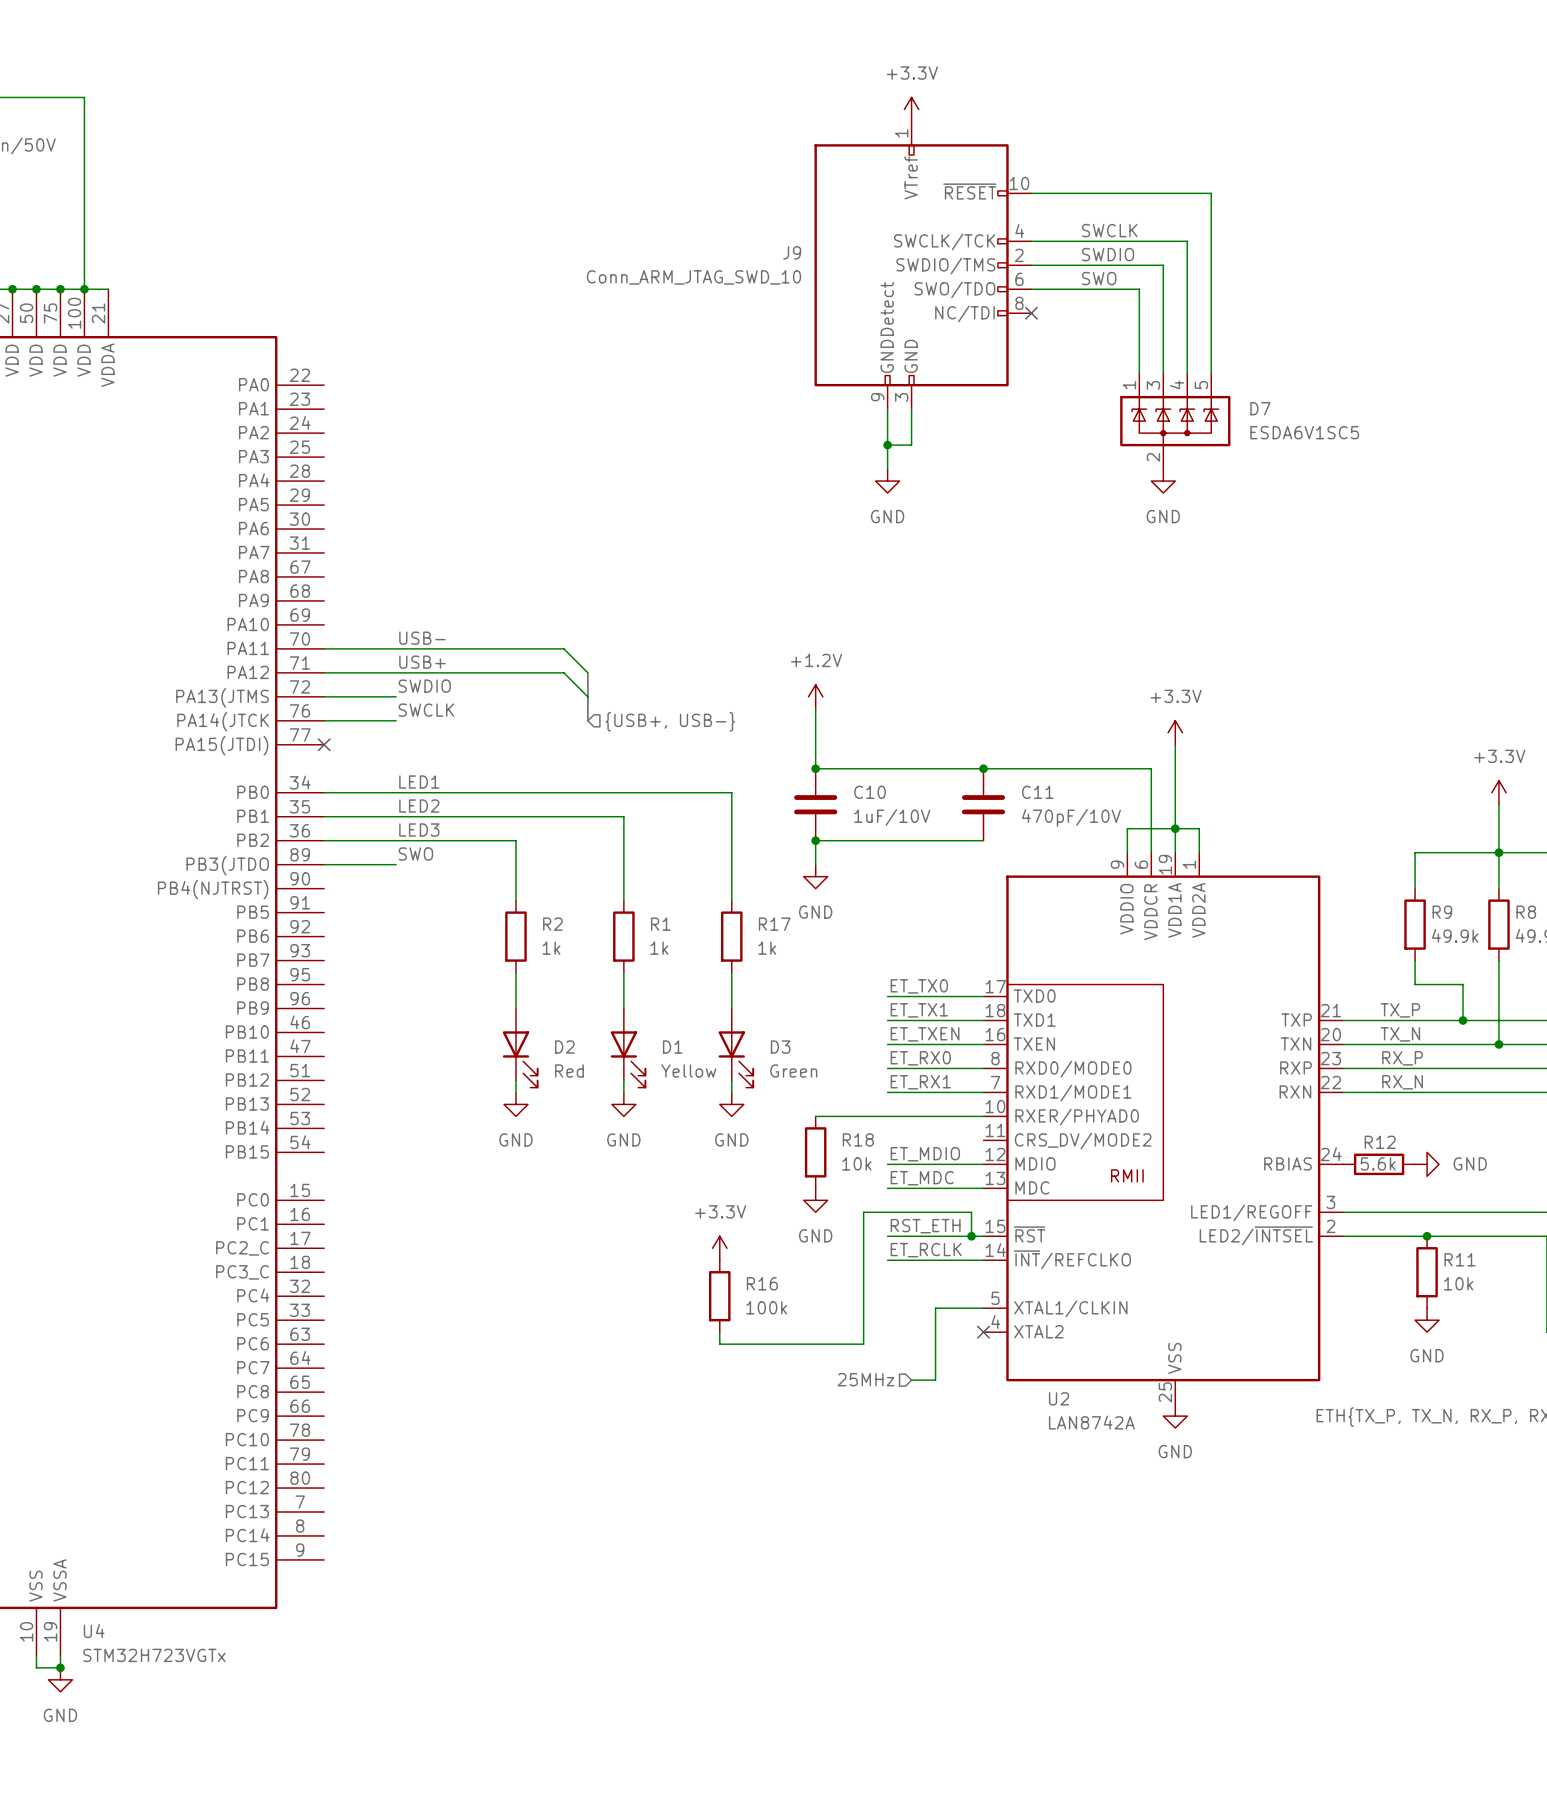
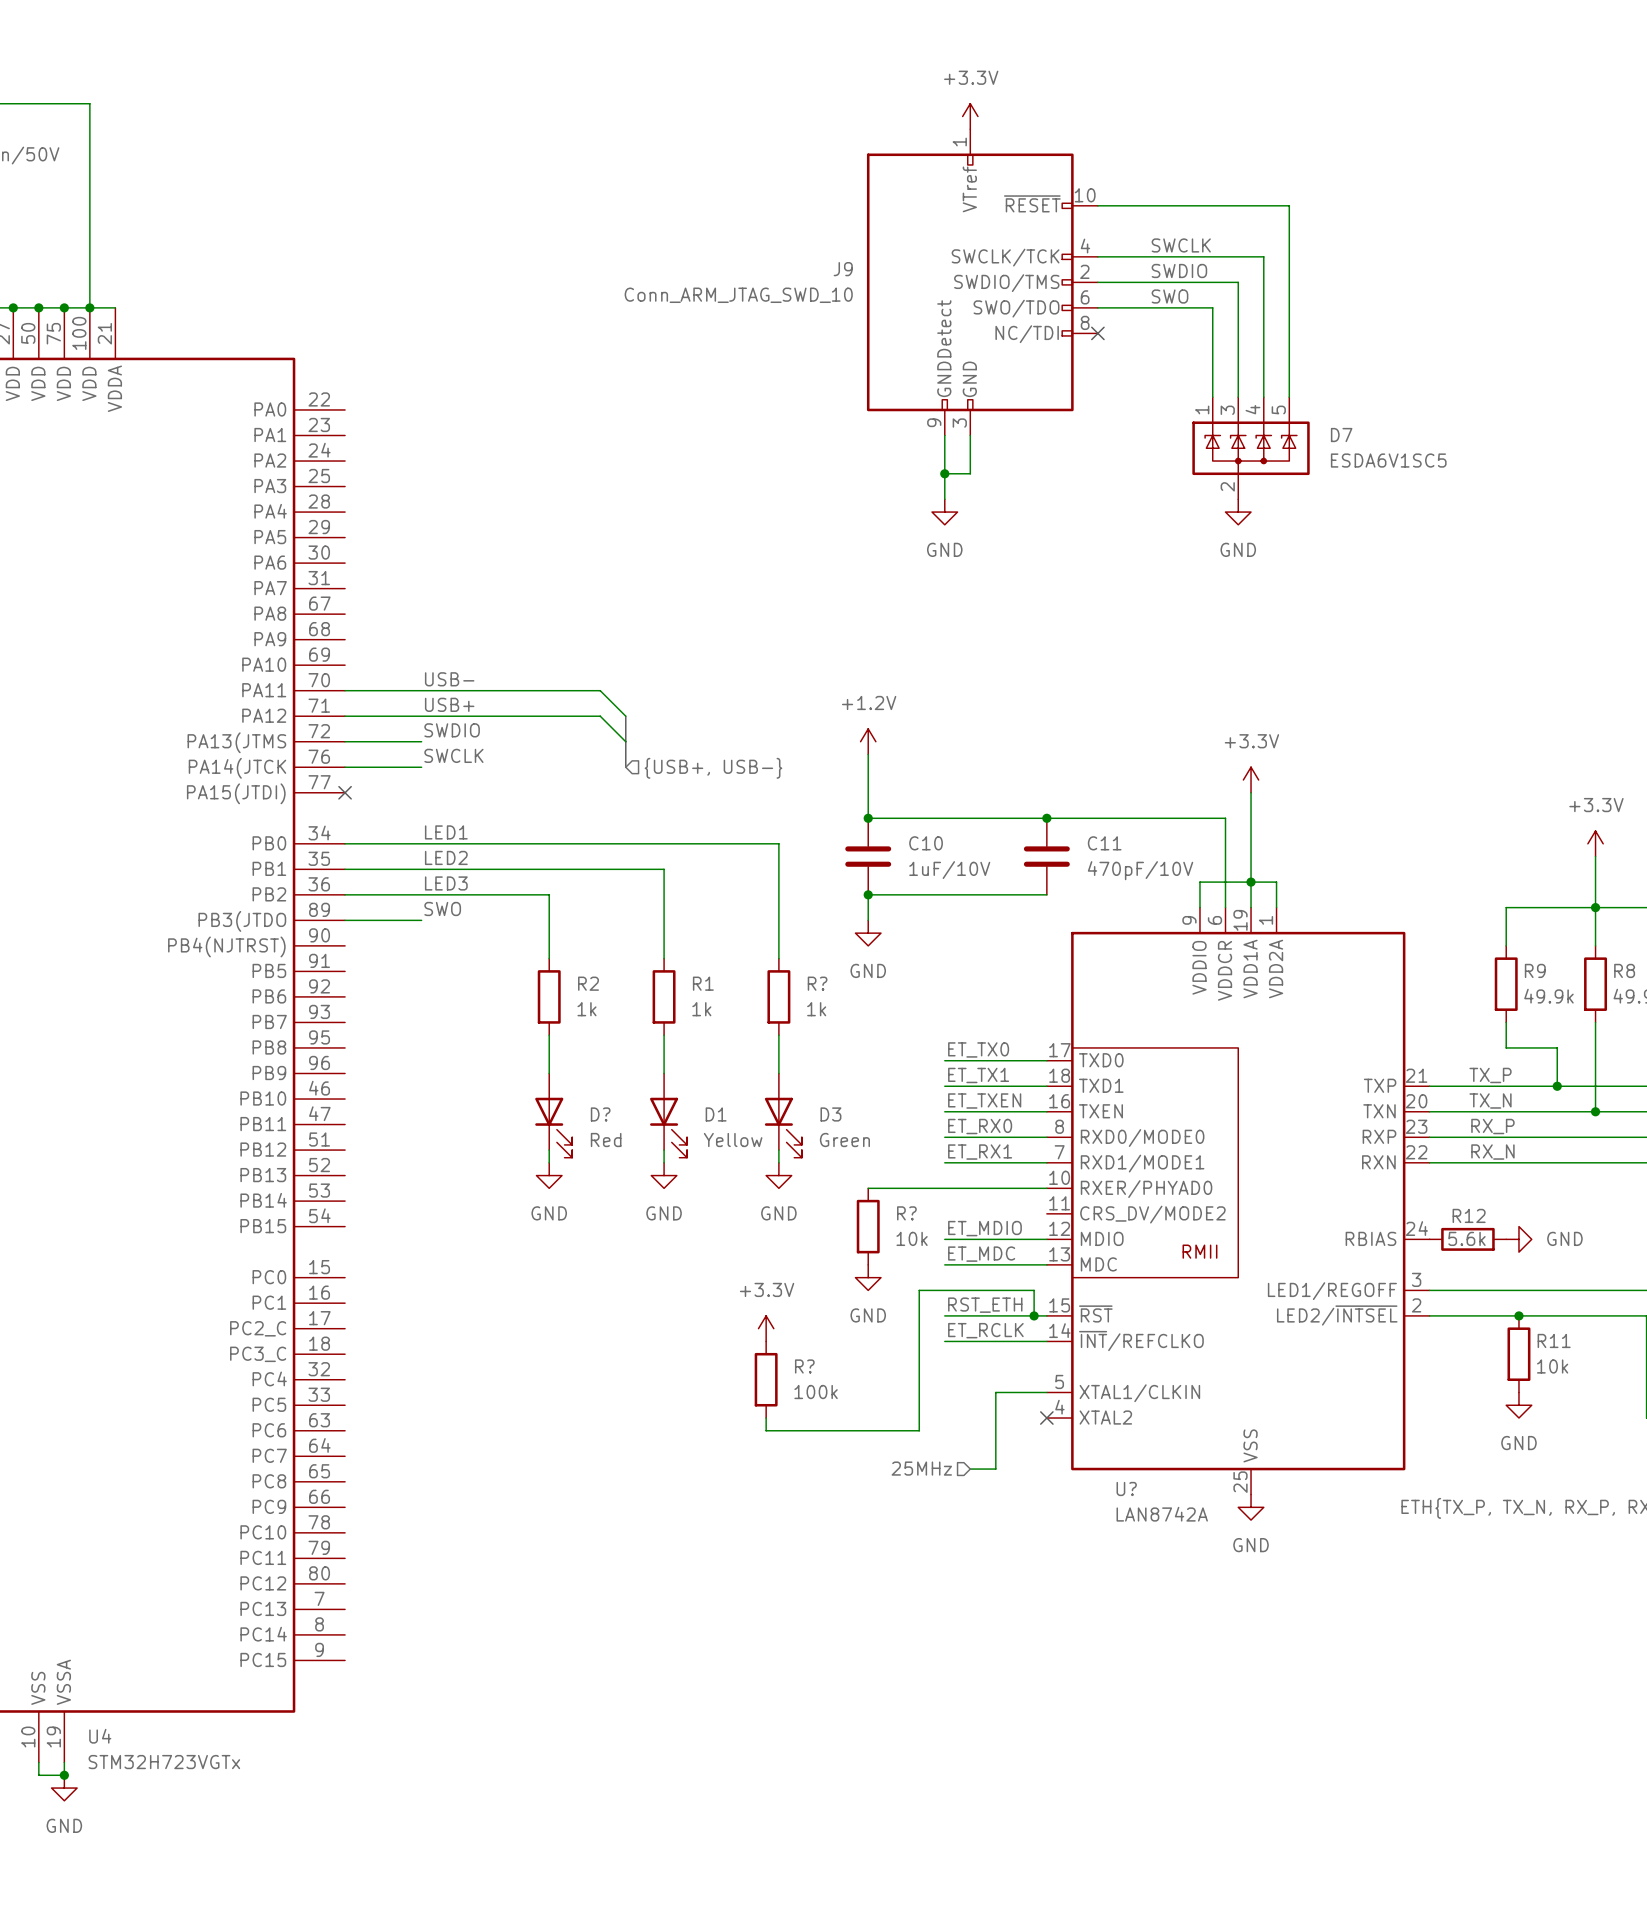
R17 name: R17 (774, 924) -> R? (817, 983)
D2 name: D2 (564, 1047) -> D? (600, 1114)
R18 name: R18 (858, 1139) -> R? (906, 1213)
R16 name: R16 (762, 1283) -> R? (804, 1366)
U2 name: U2 (1059, 1398) -> U? (1126, 1488)

